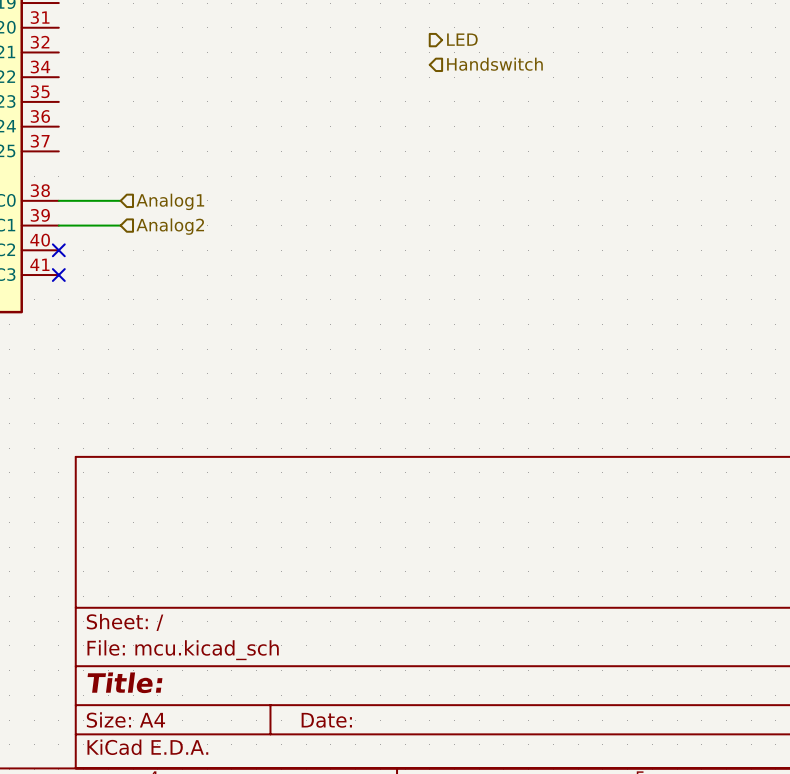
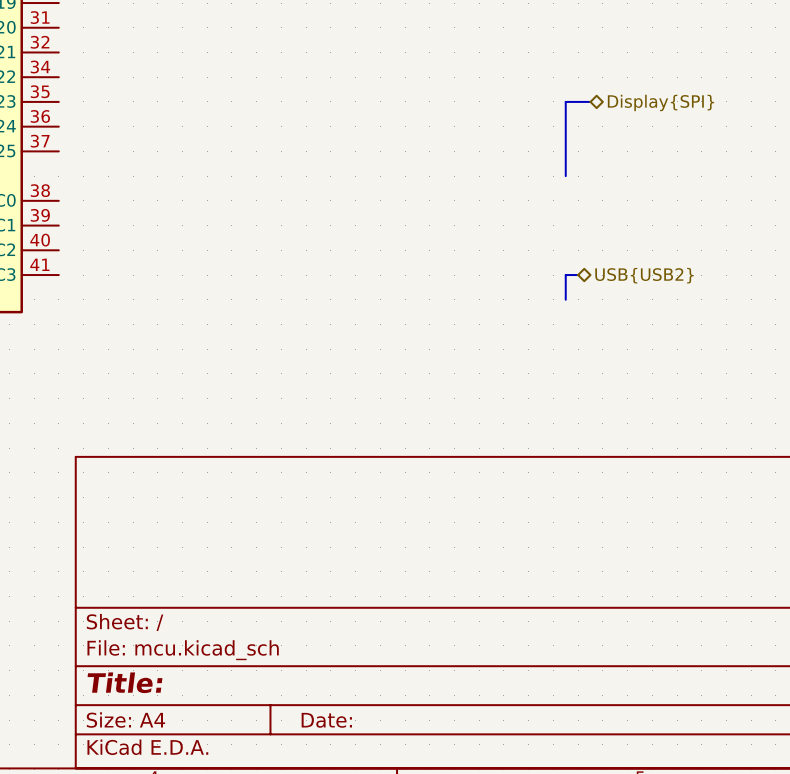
hierarchical label: LED (462, 39) -> none
hierarchical label: Handswitch (494, 64) -> none
bus: none -> (590, 101) (565, 101) (565, 176)
hierarchical label: none -> Display{SPI} (661, 102)
wire: (58, 200) (120, 200) -> none
hierarchical label: Analog1 (170, 201) -> none
wire: (58, 225) (120, 225) -> none
hierarchical label: Analog2 (170, 226) -> none
no-connect mark: (58, 250) -> none
no-connect mark: (58, 275) -> none
bus: none -> (578, 275) (565, 275) (565, 299)
hierarchical label: none -> USB{USB2} (644, 275)

